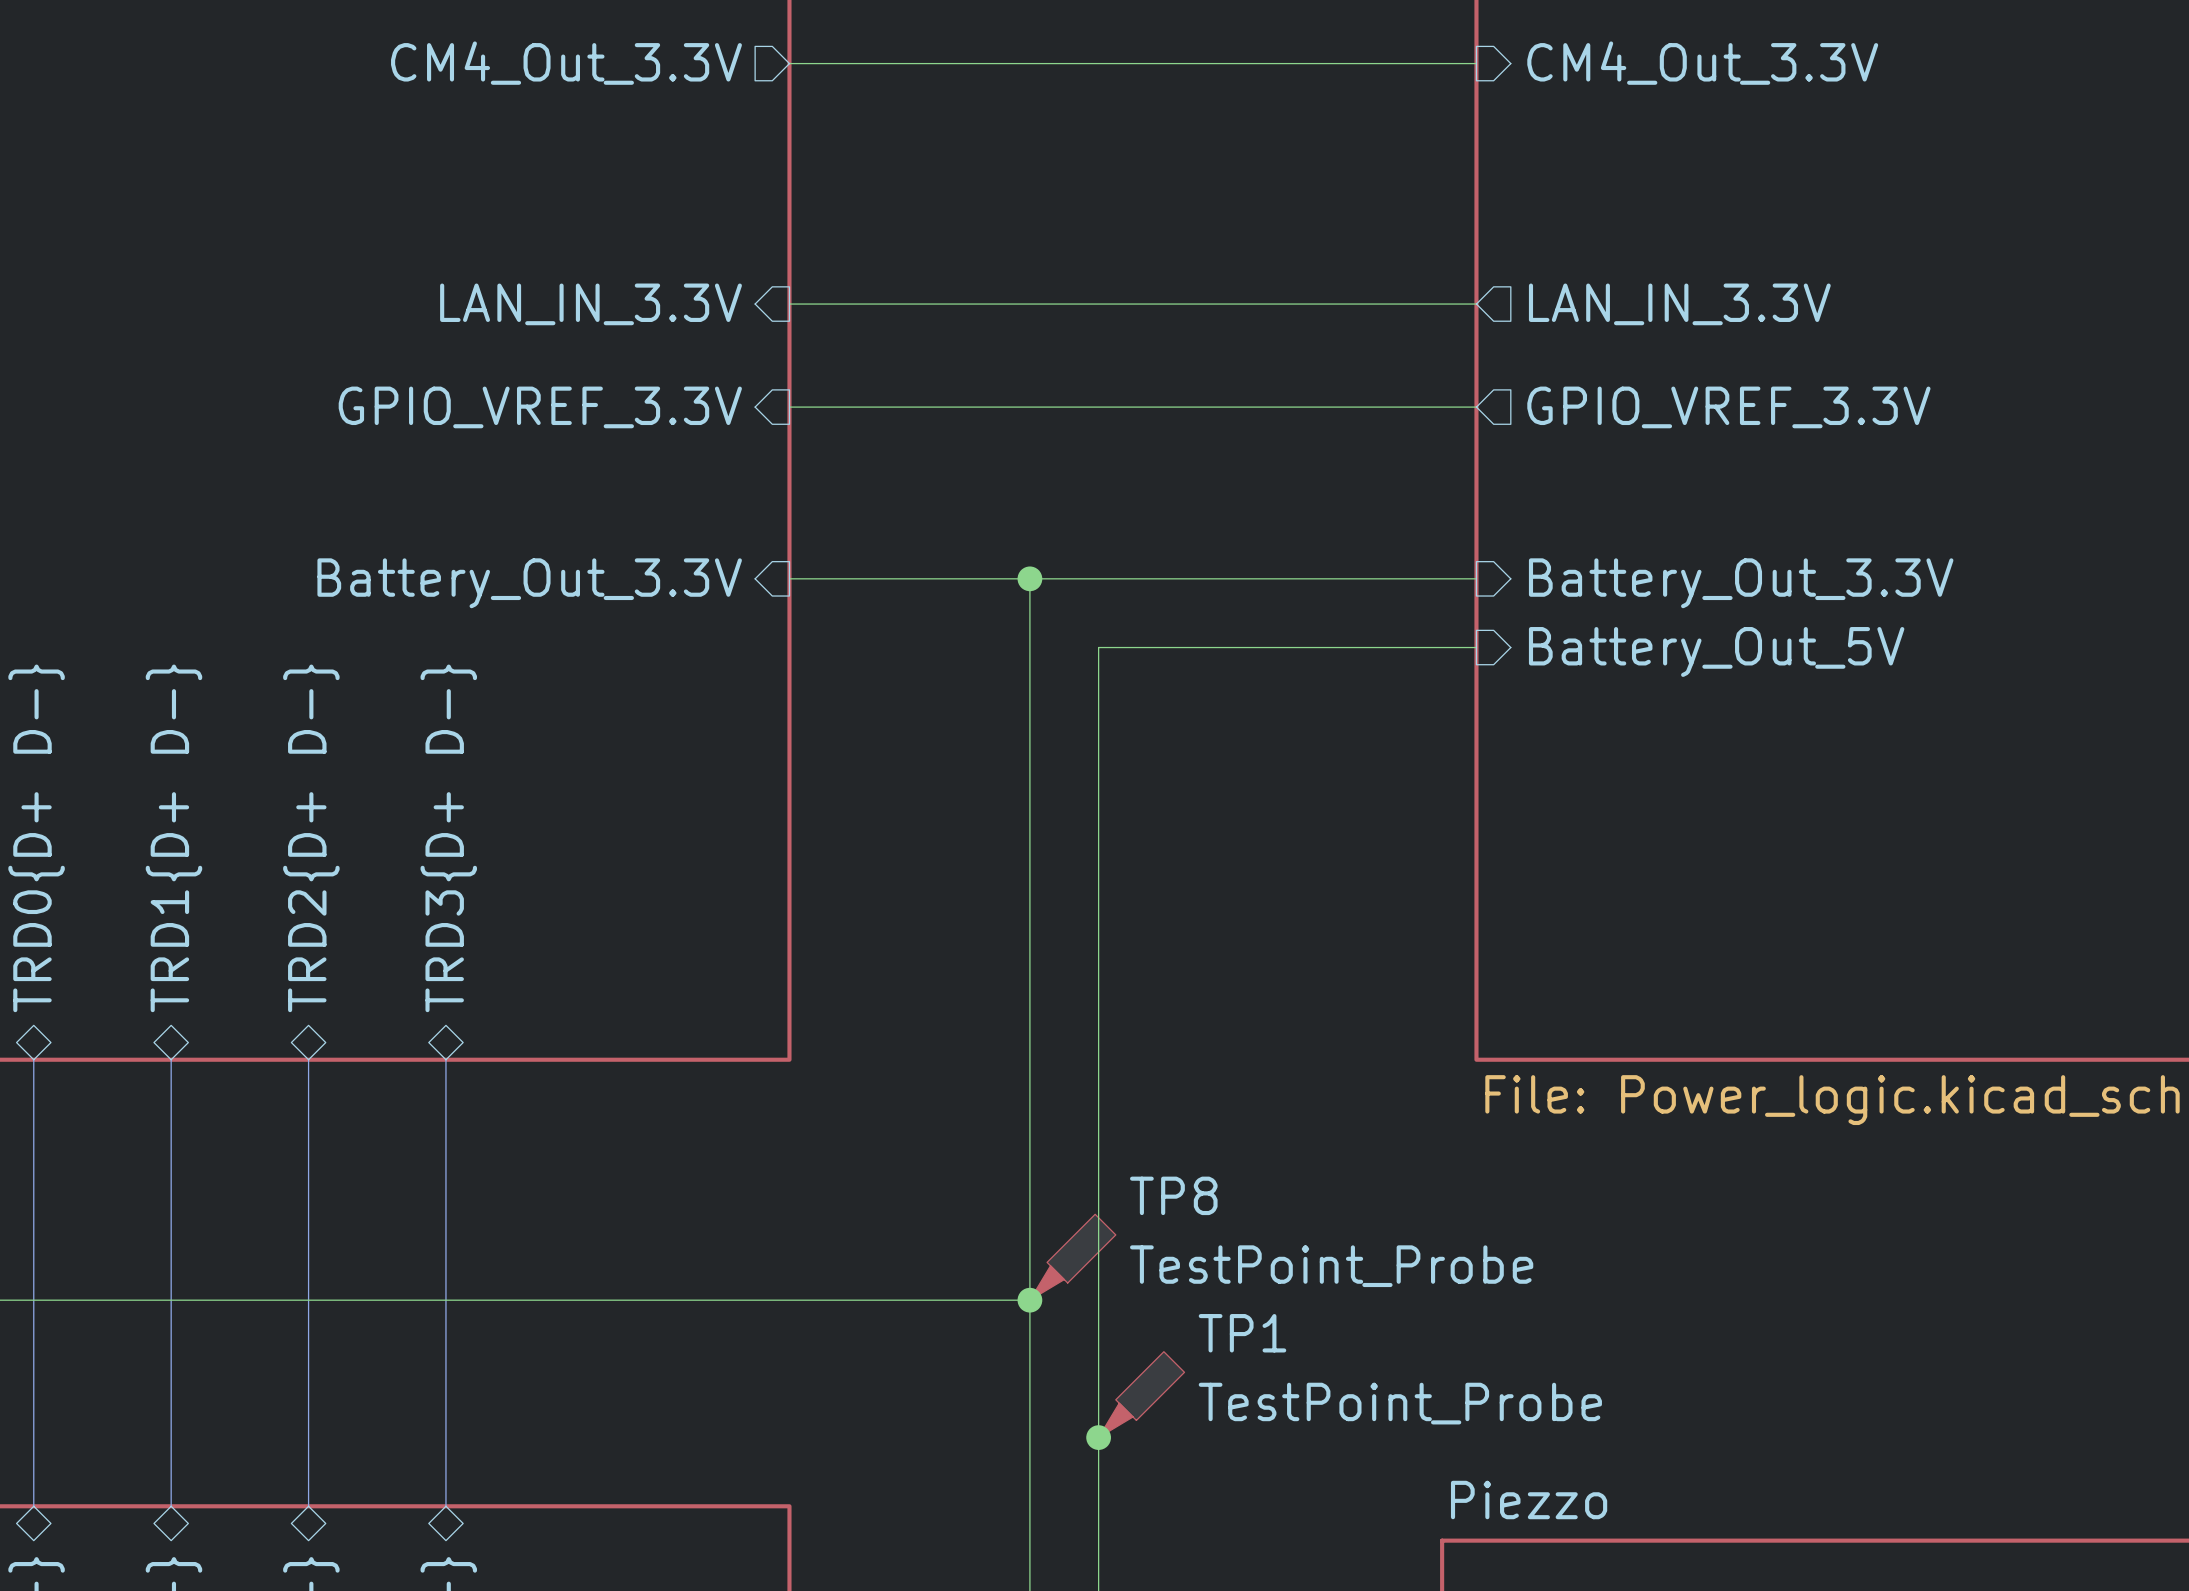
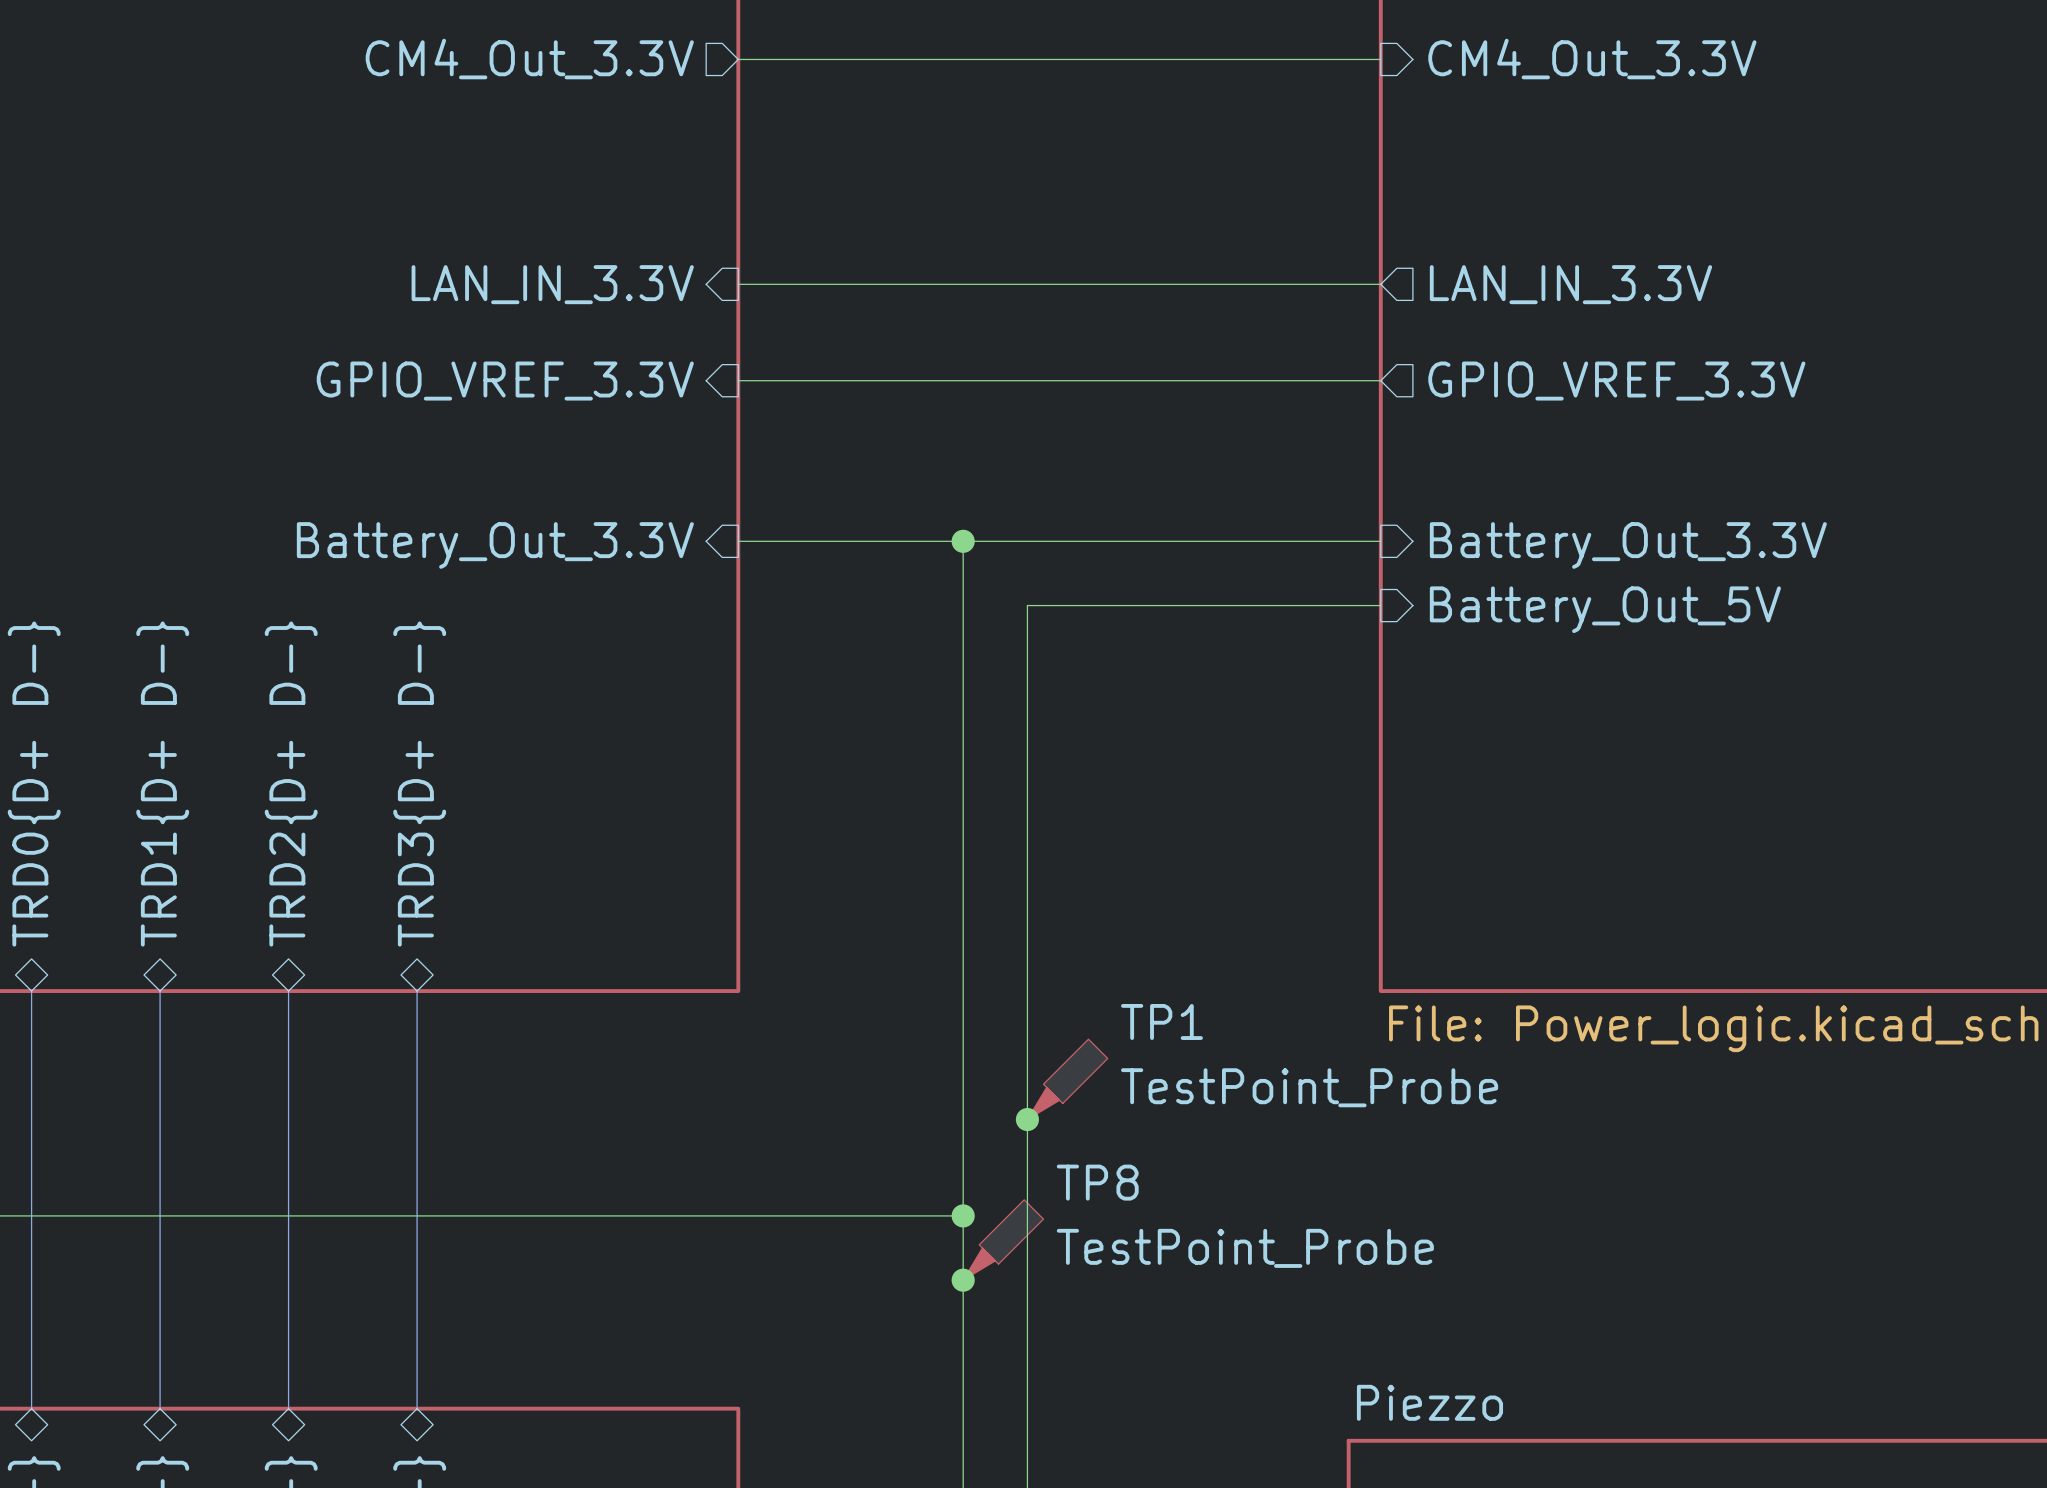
junction: none -> (1027, 1119)
TP8 position: (1072, 1257) -> (1003, 1240)
TP1 position: (1141, 1394) -> (1067, 1079)
junction position: (1098, 1437) -> (963, 1280)

